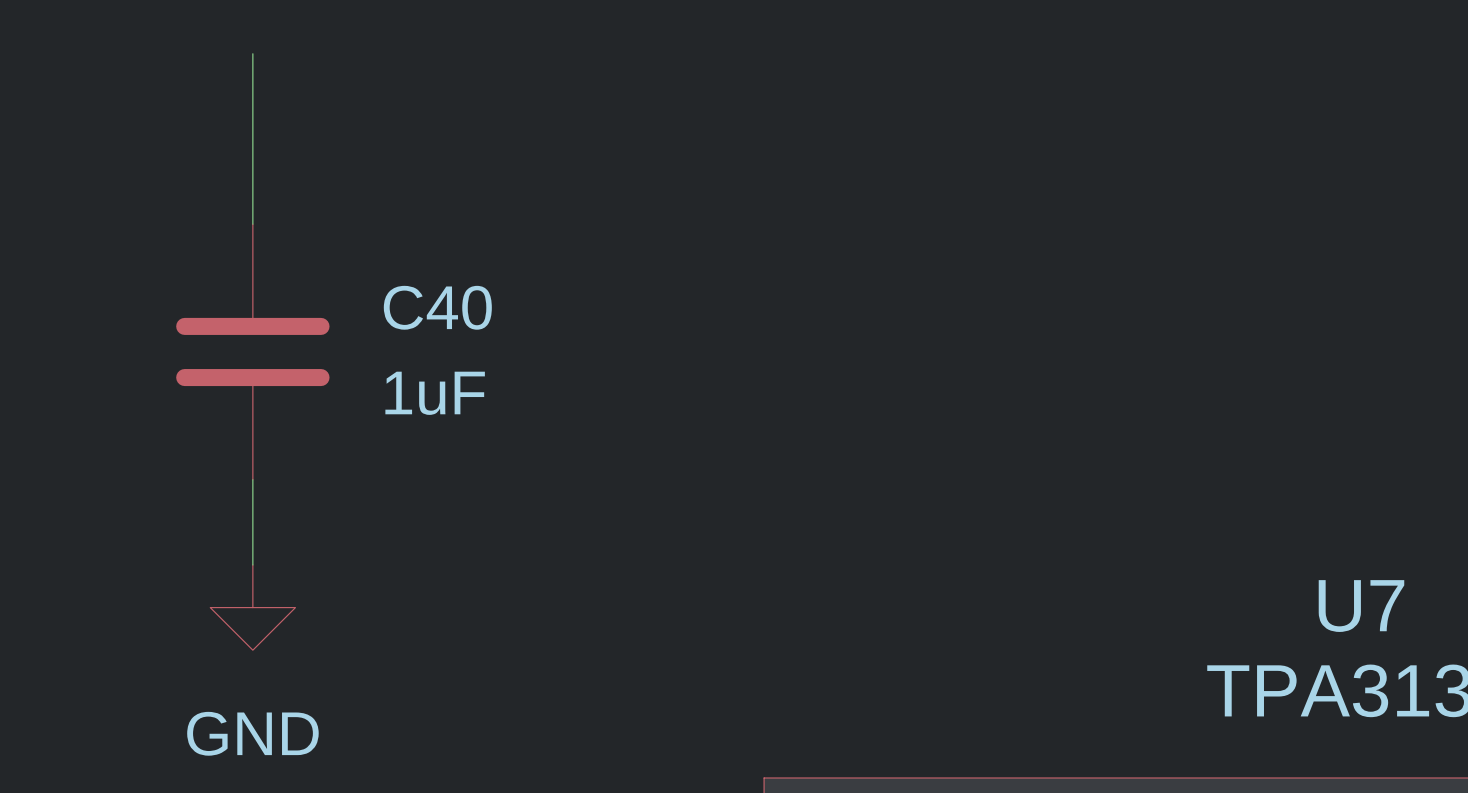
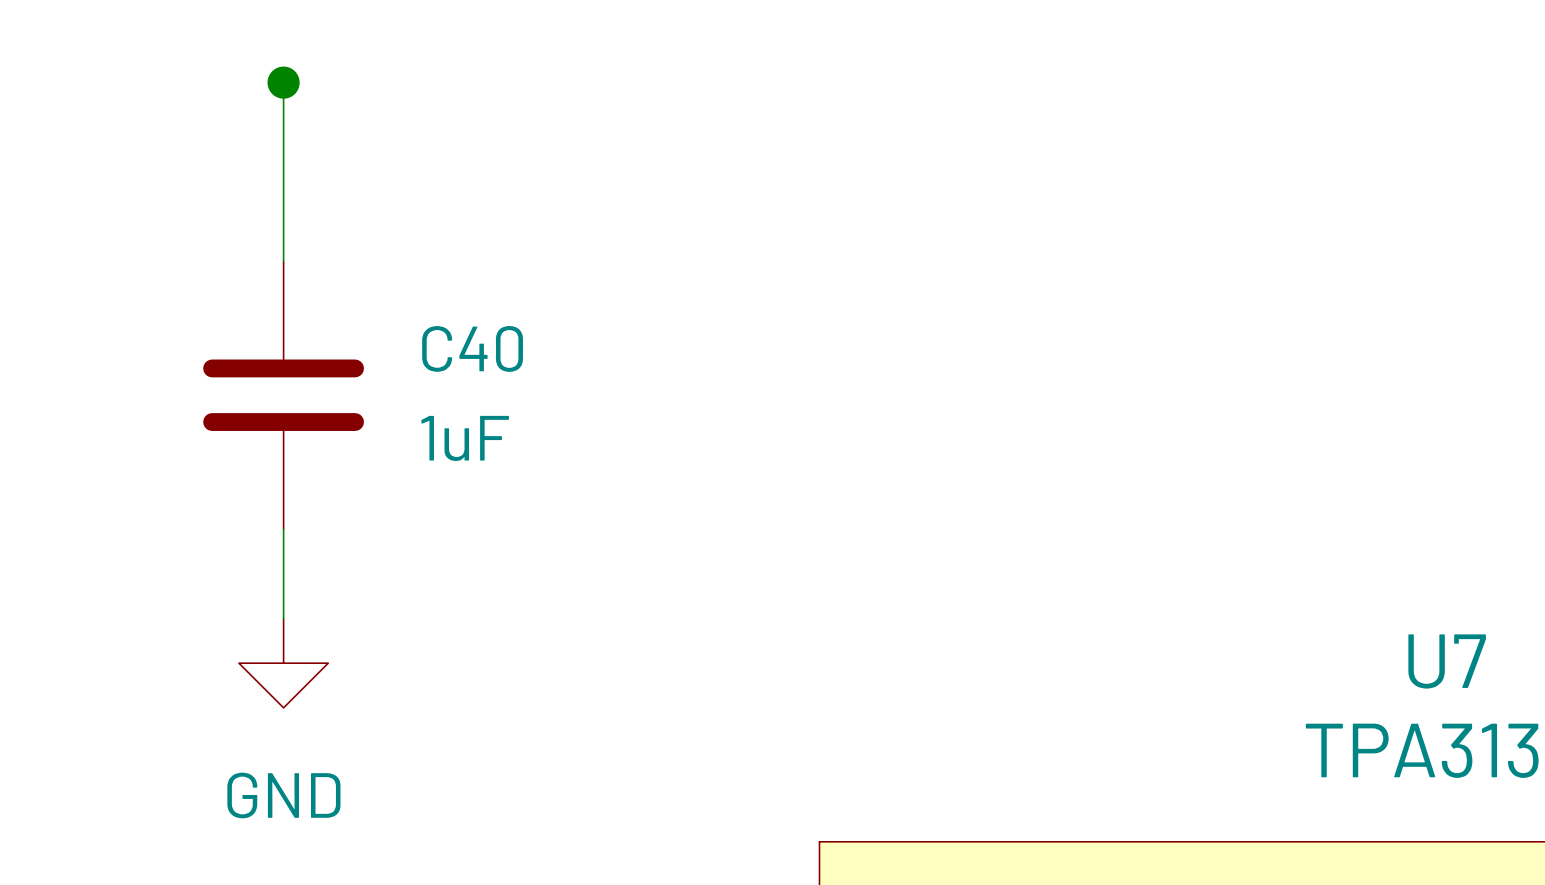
junction: none -> (283, 82)

